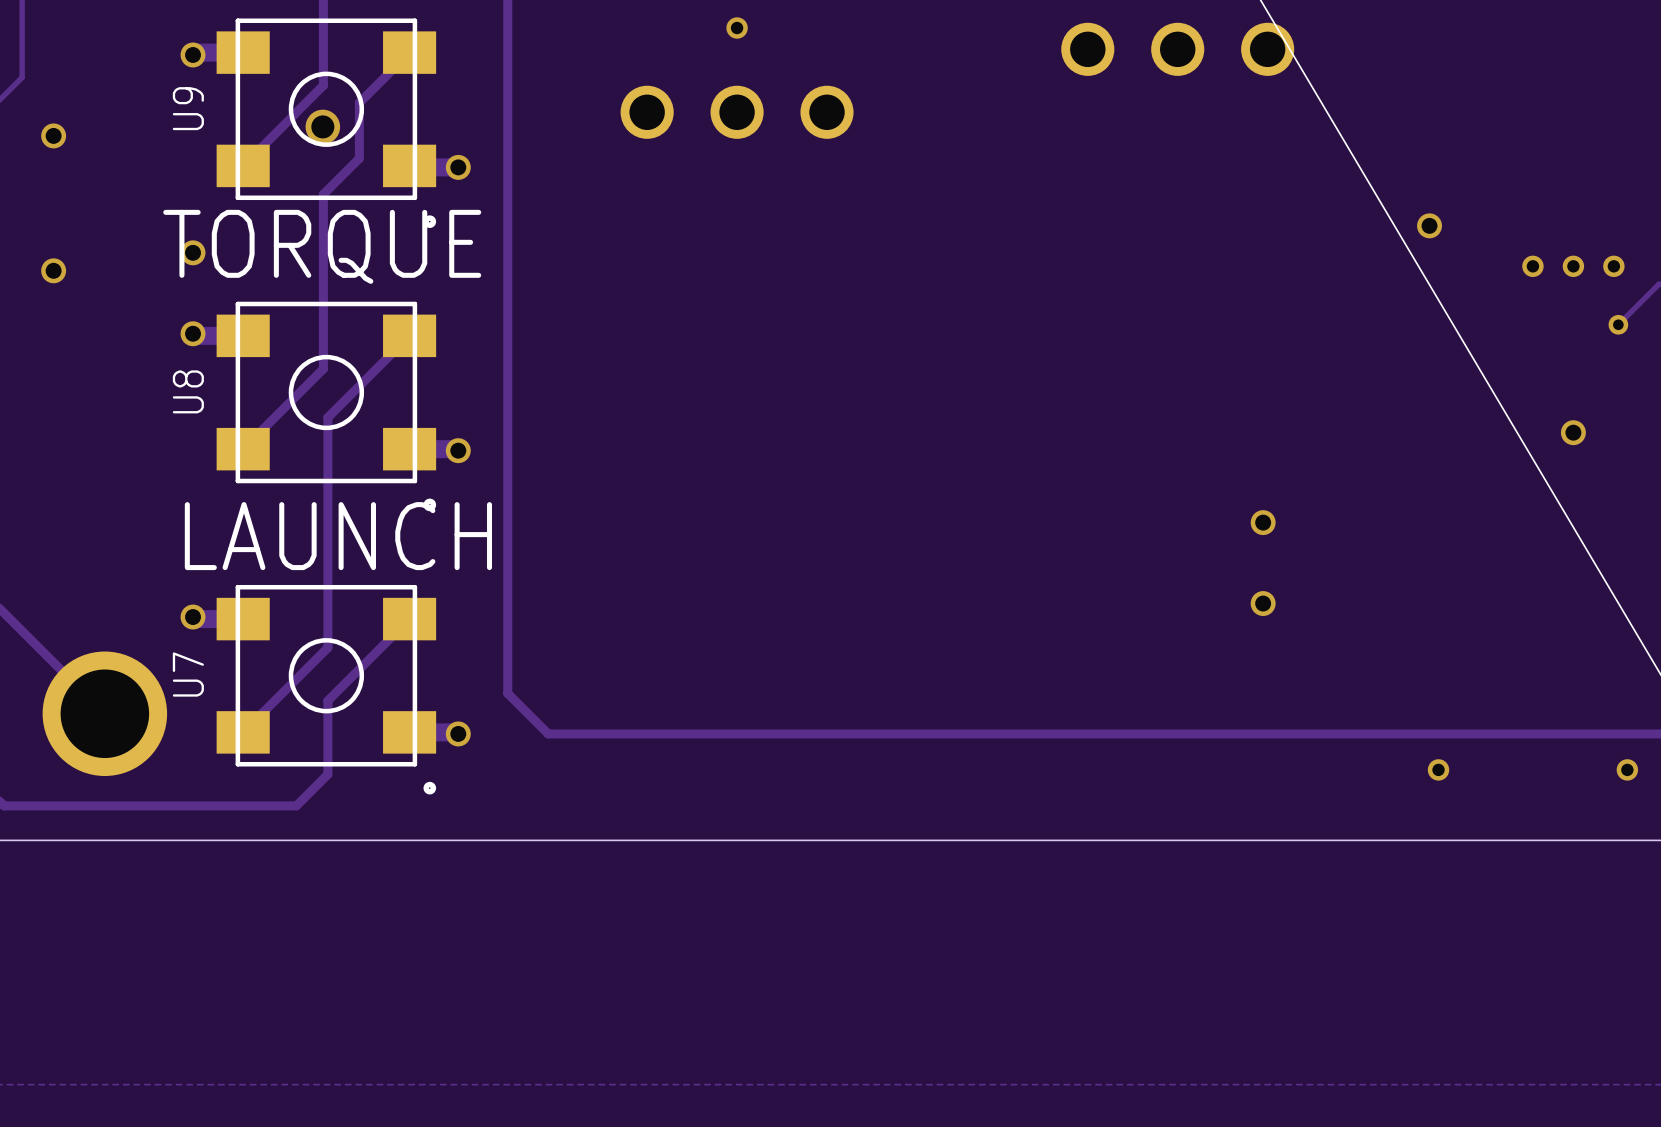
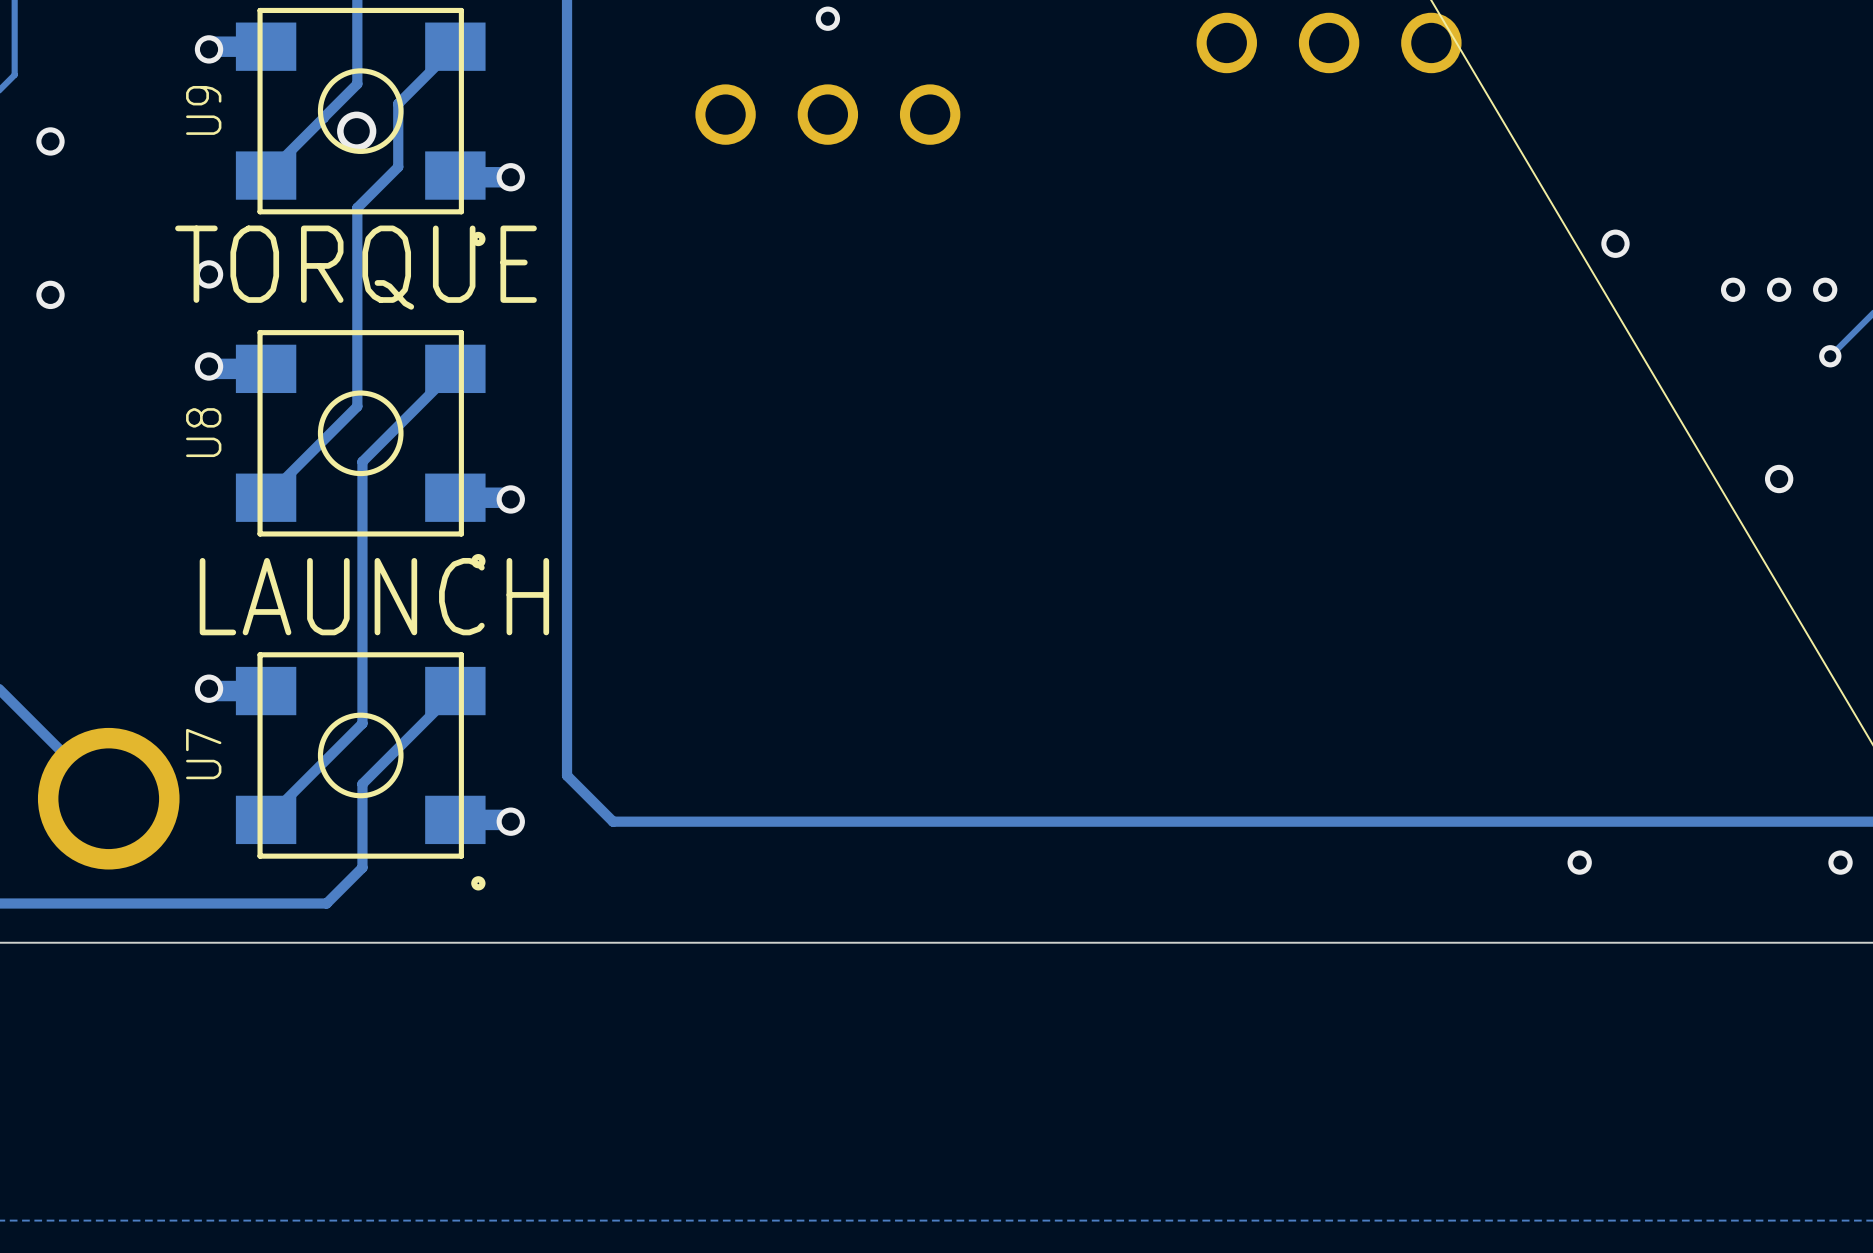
via: (1263, 522) -> none
via: (1263, 603) -> none
via position: (1438, 769) -> (1579, 862)

